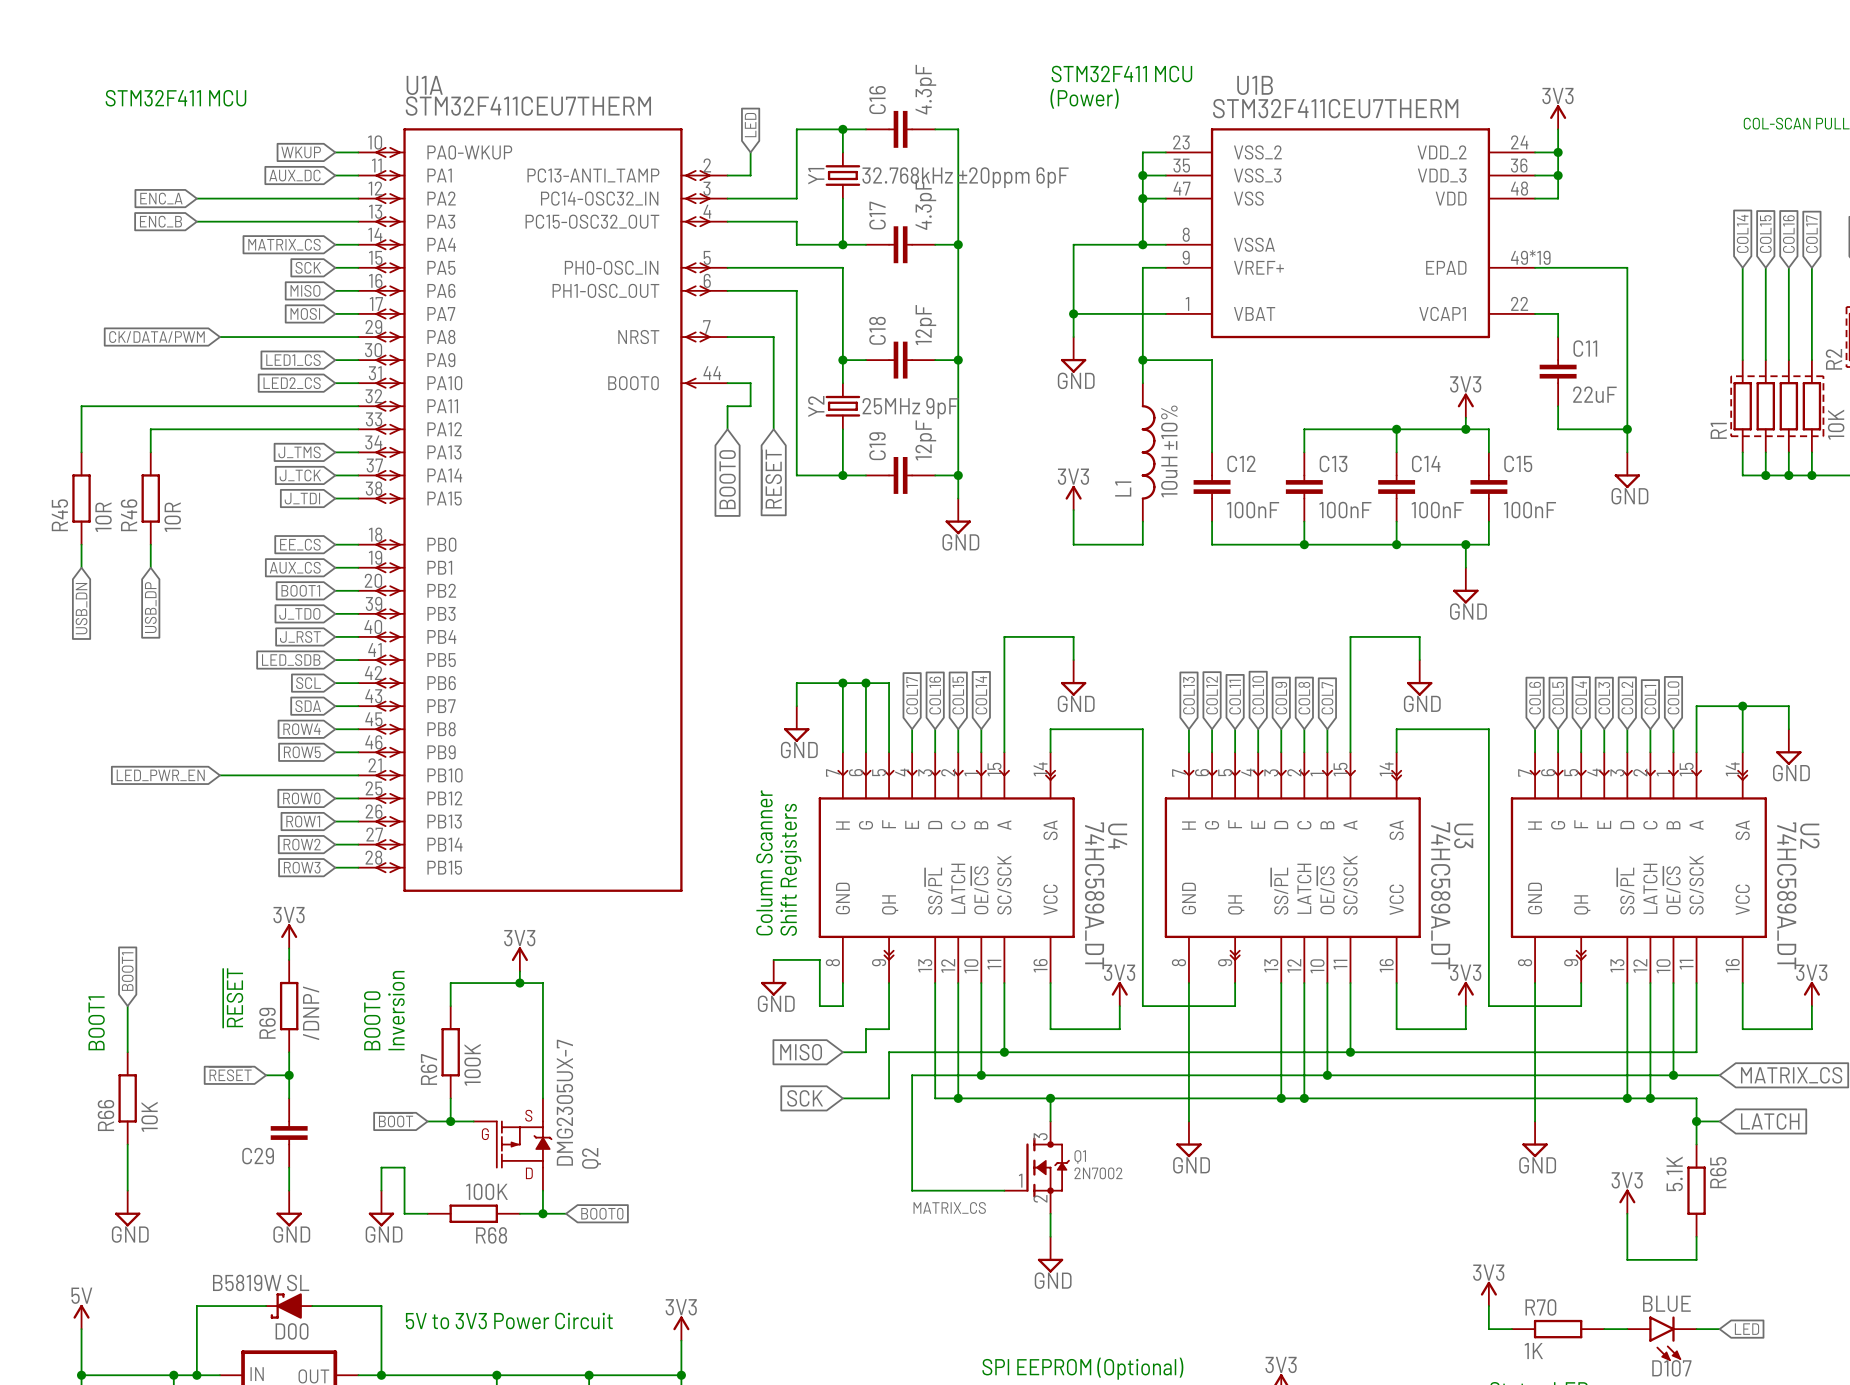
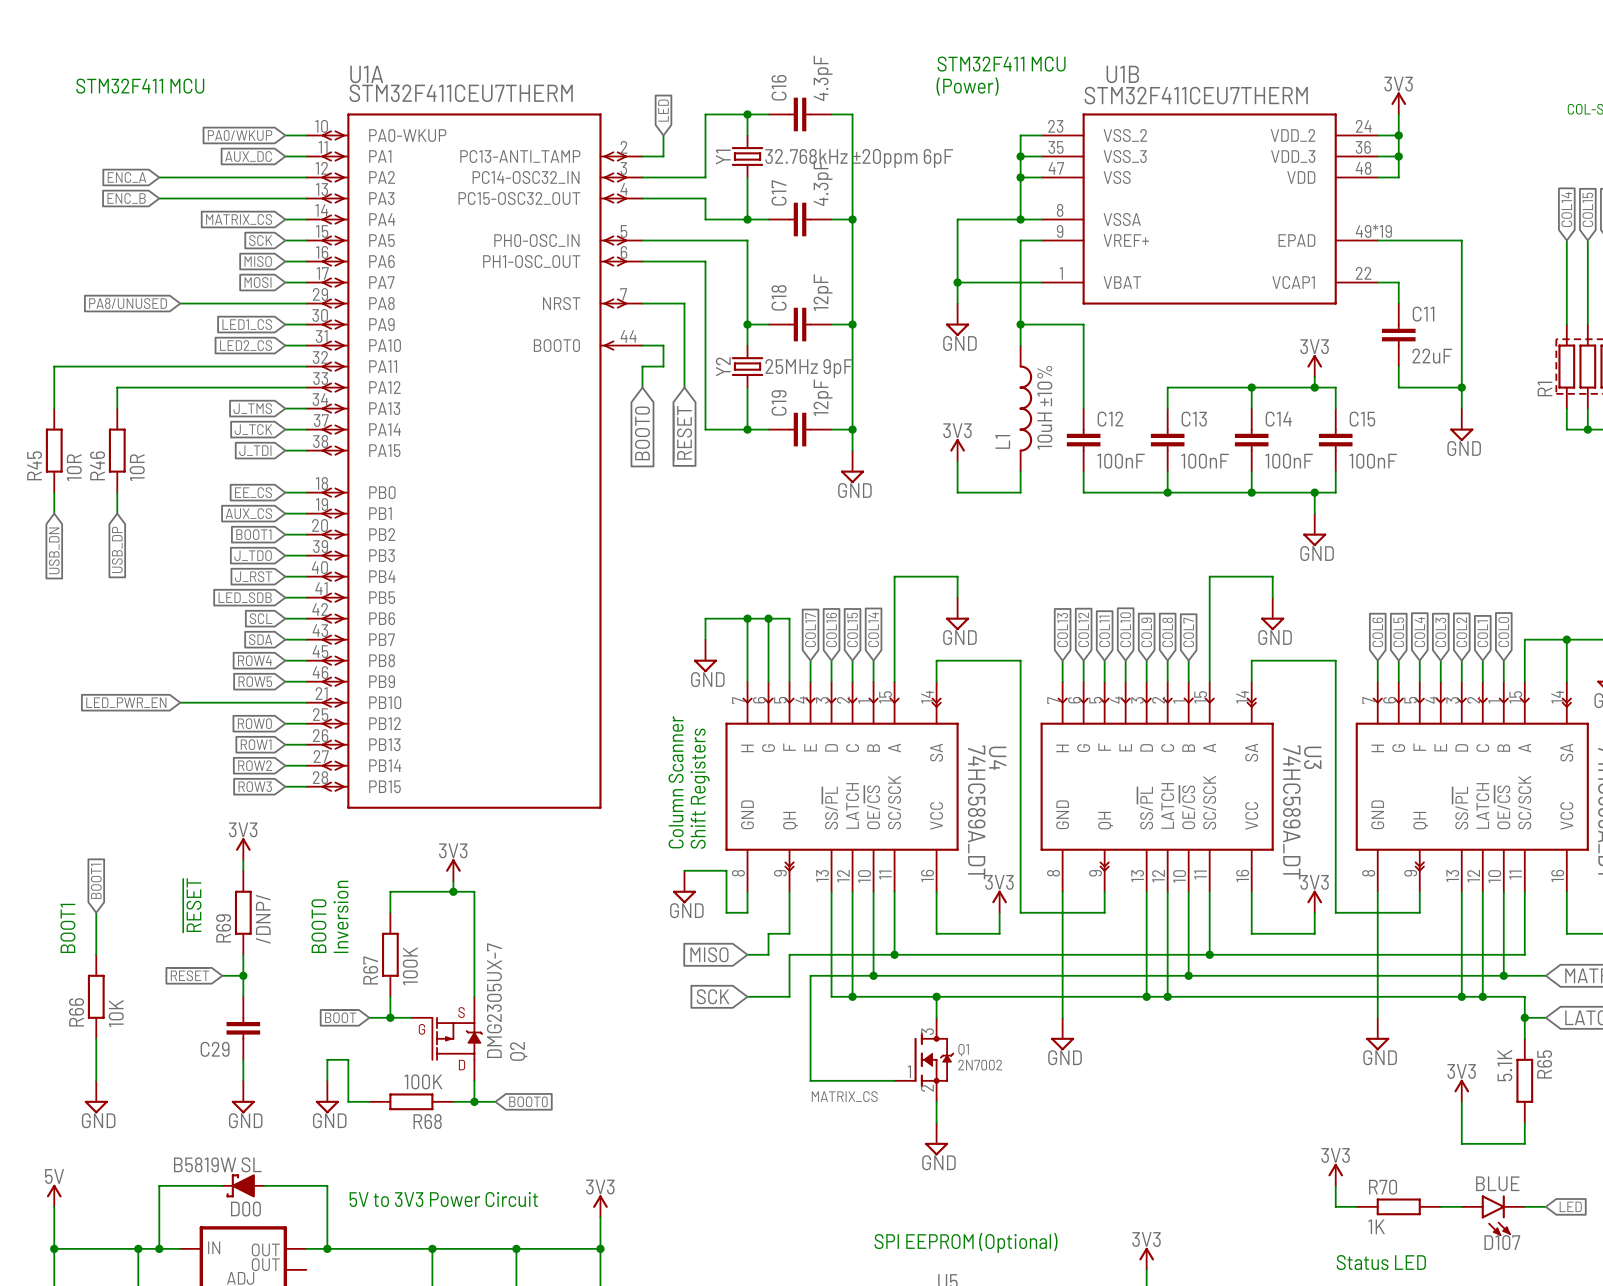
global label: WKUP (301, 152) -> PA0/WKUP (240, 135)
global label: CK/DATA/PWM (156, 337) -> PA8/UNUSED (128, 303)

